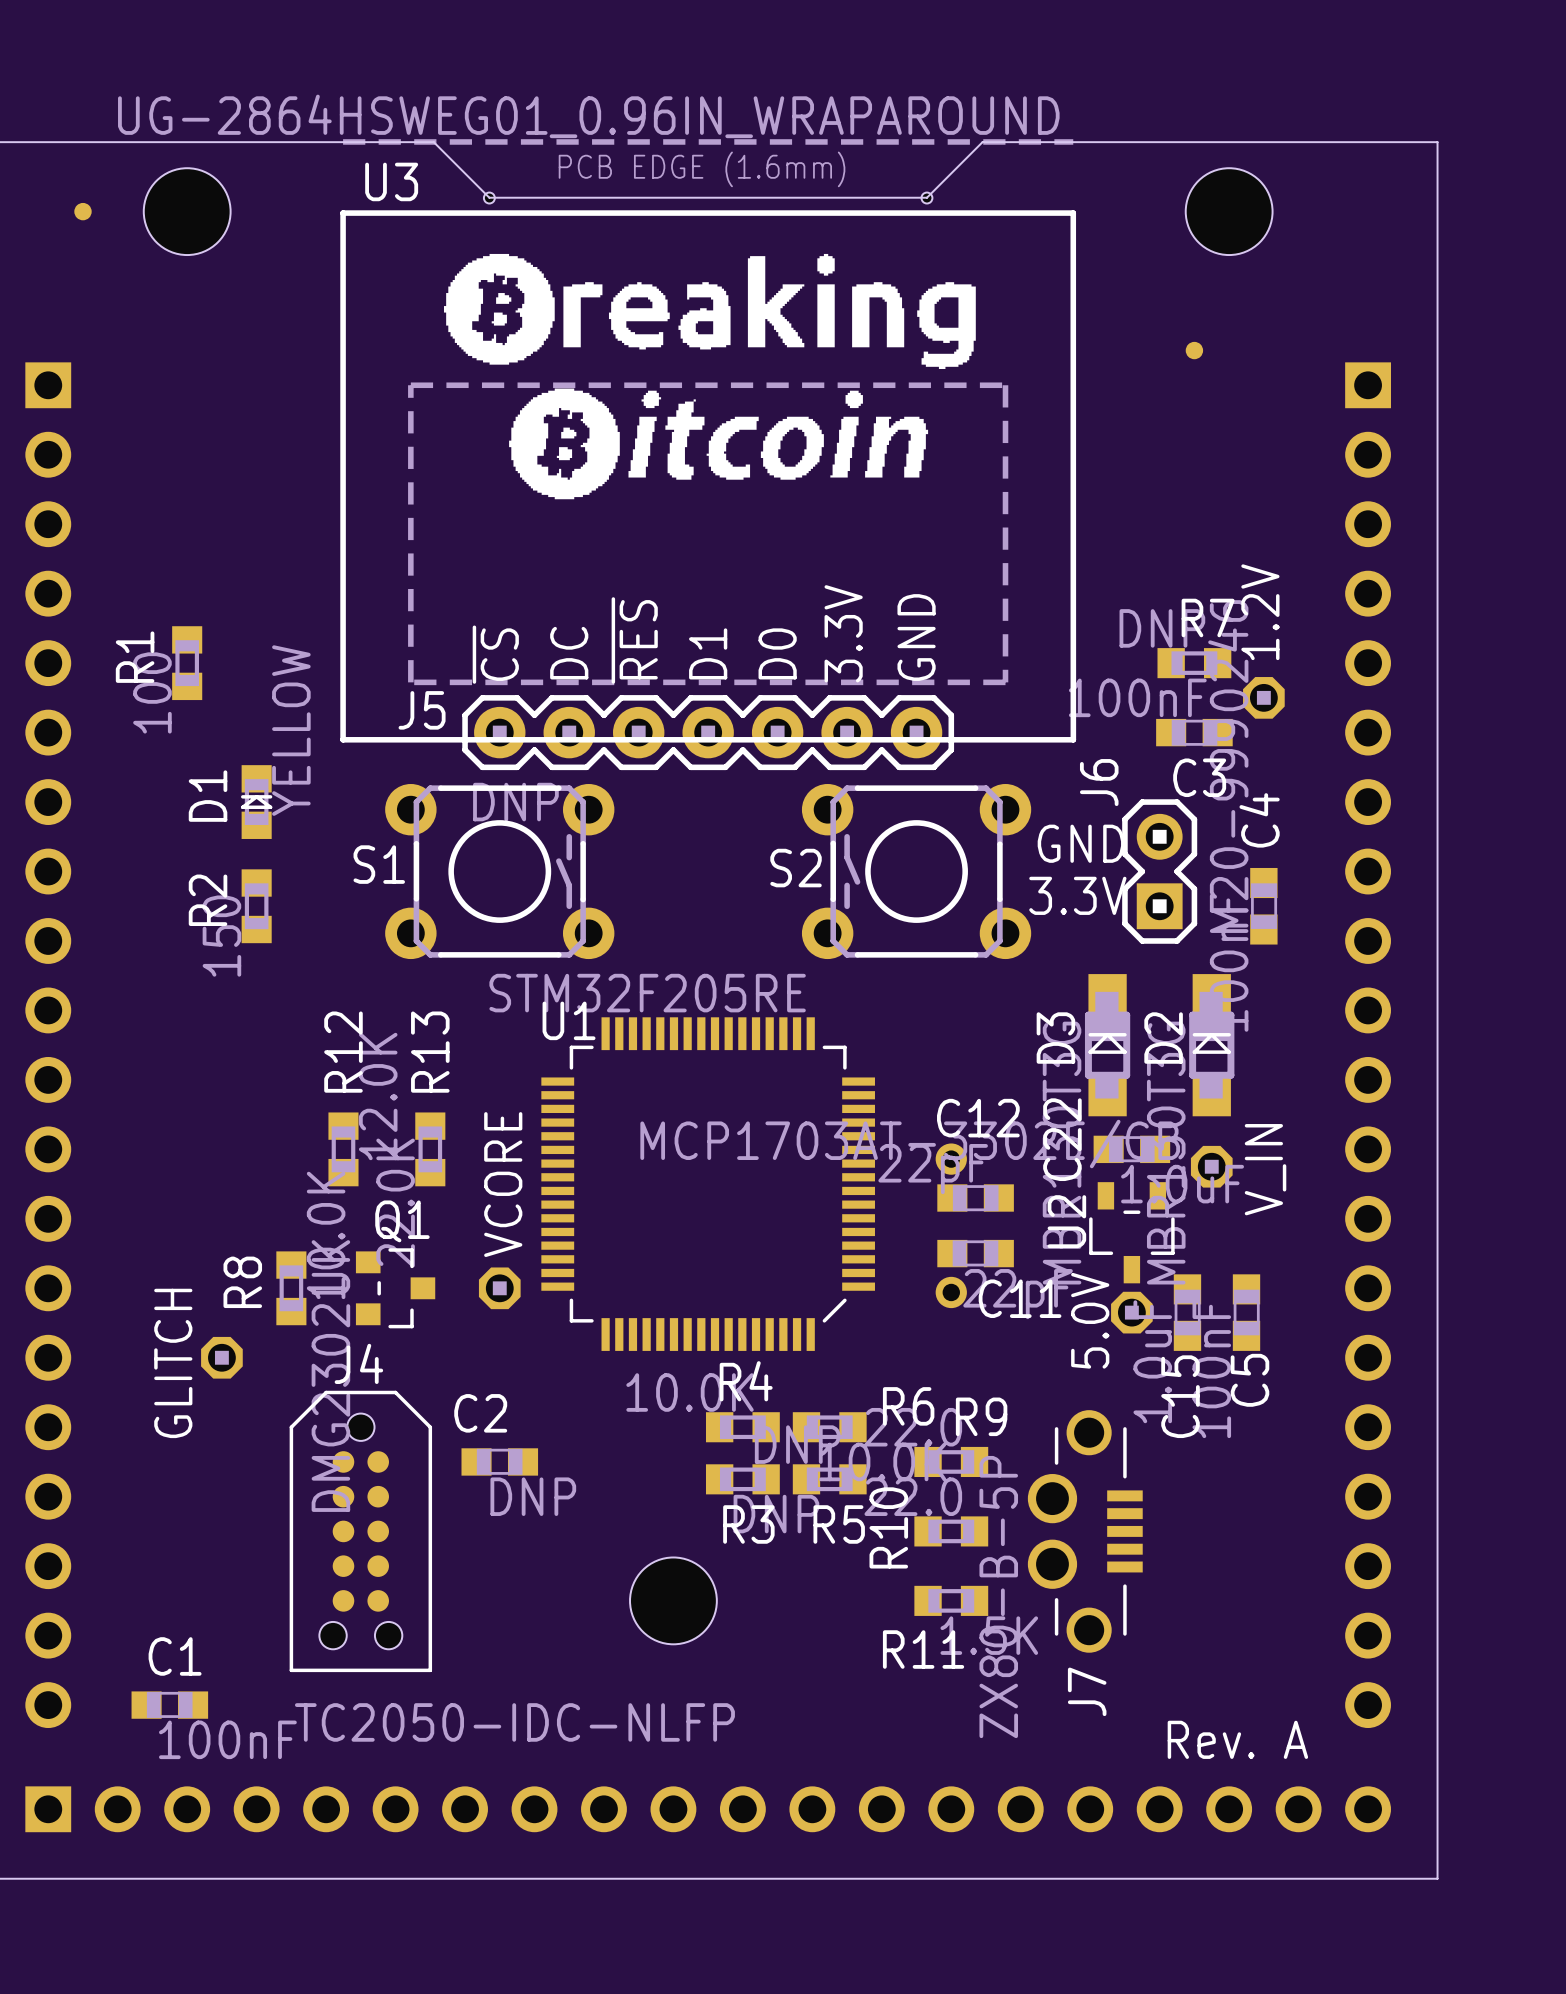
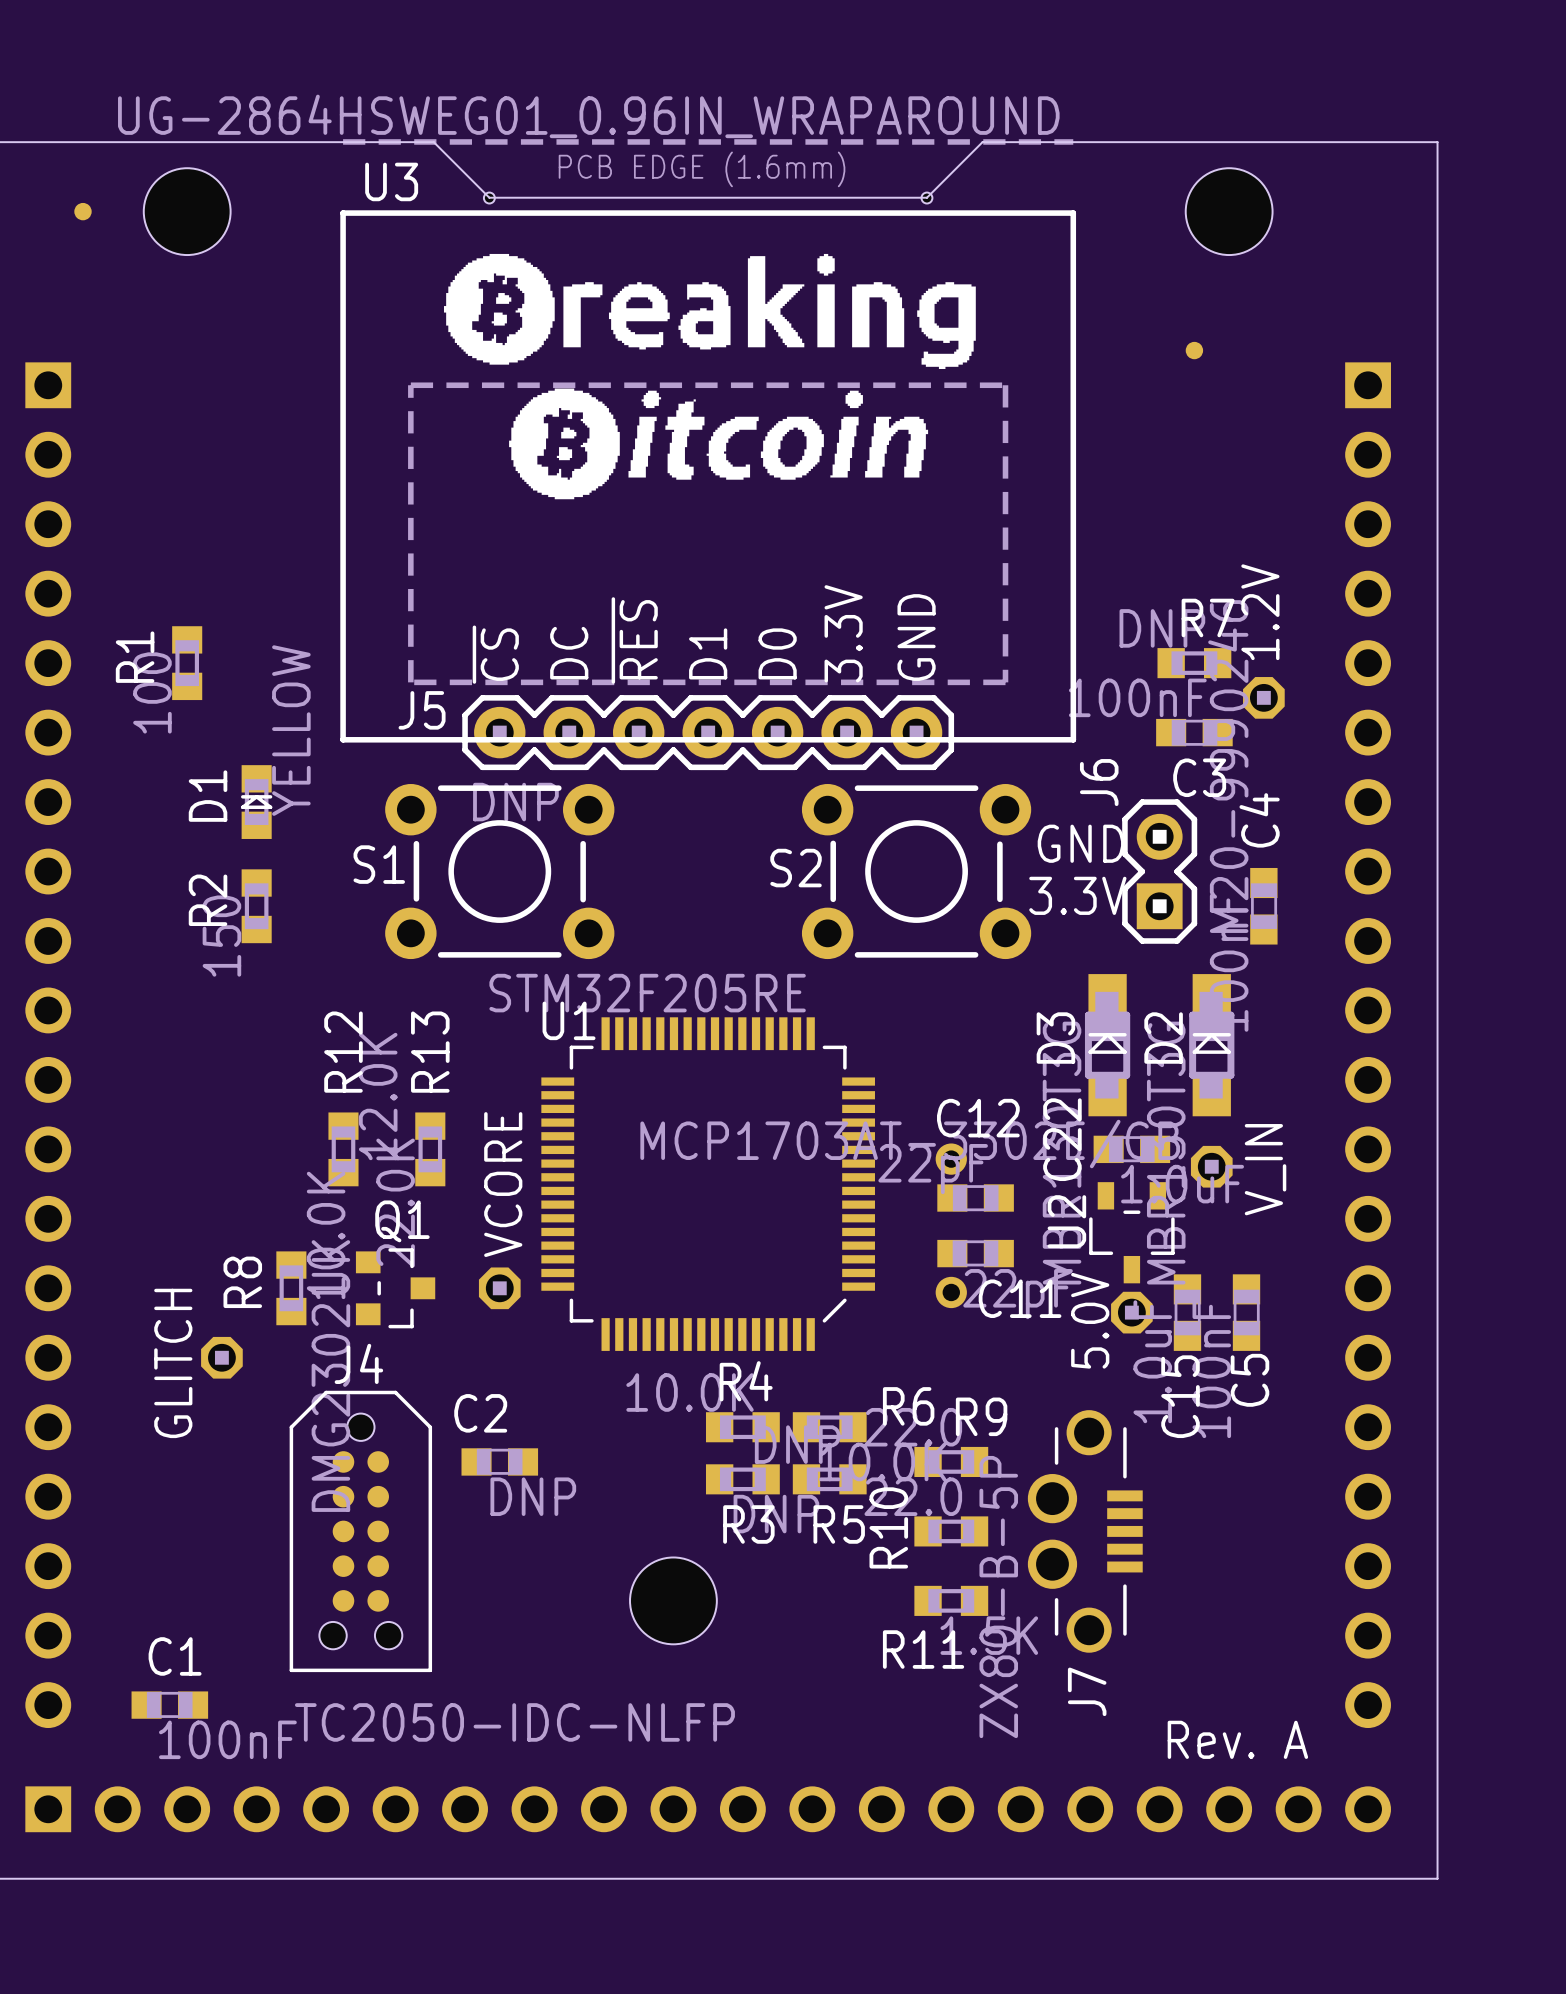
S1 footprint: [385, 784, 615, 960] -> [385, 784, 615, 960]
S2 footprint: [801, 784, 1032, 960] -> [801, 784, 1032, 960]

